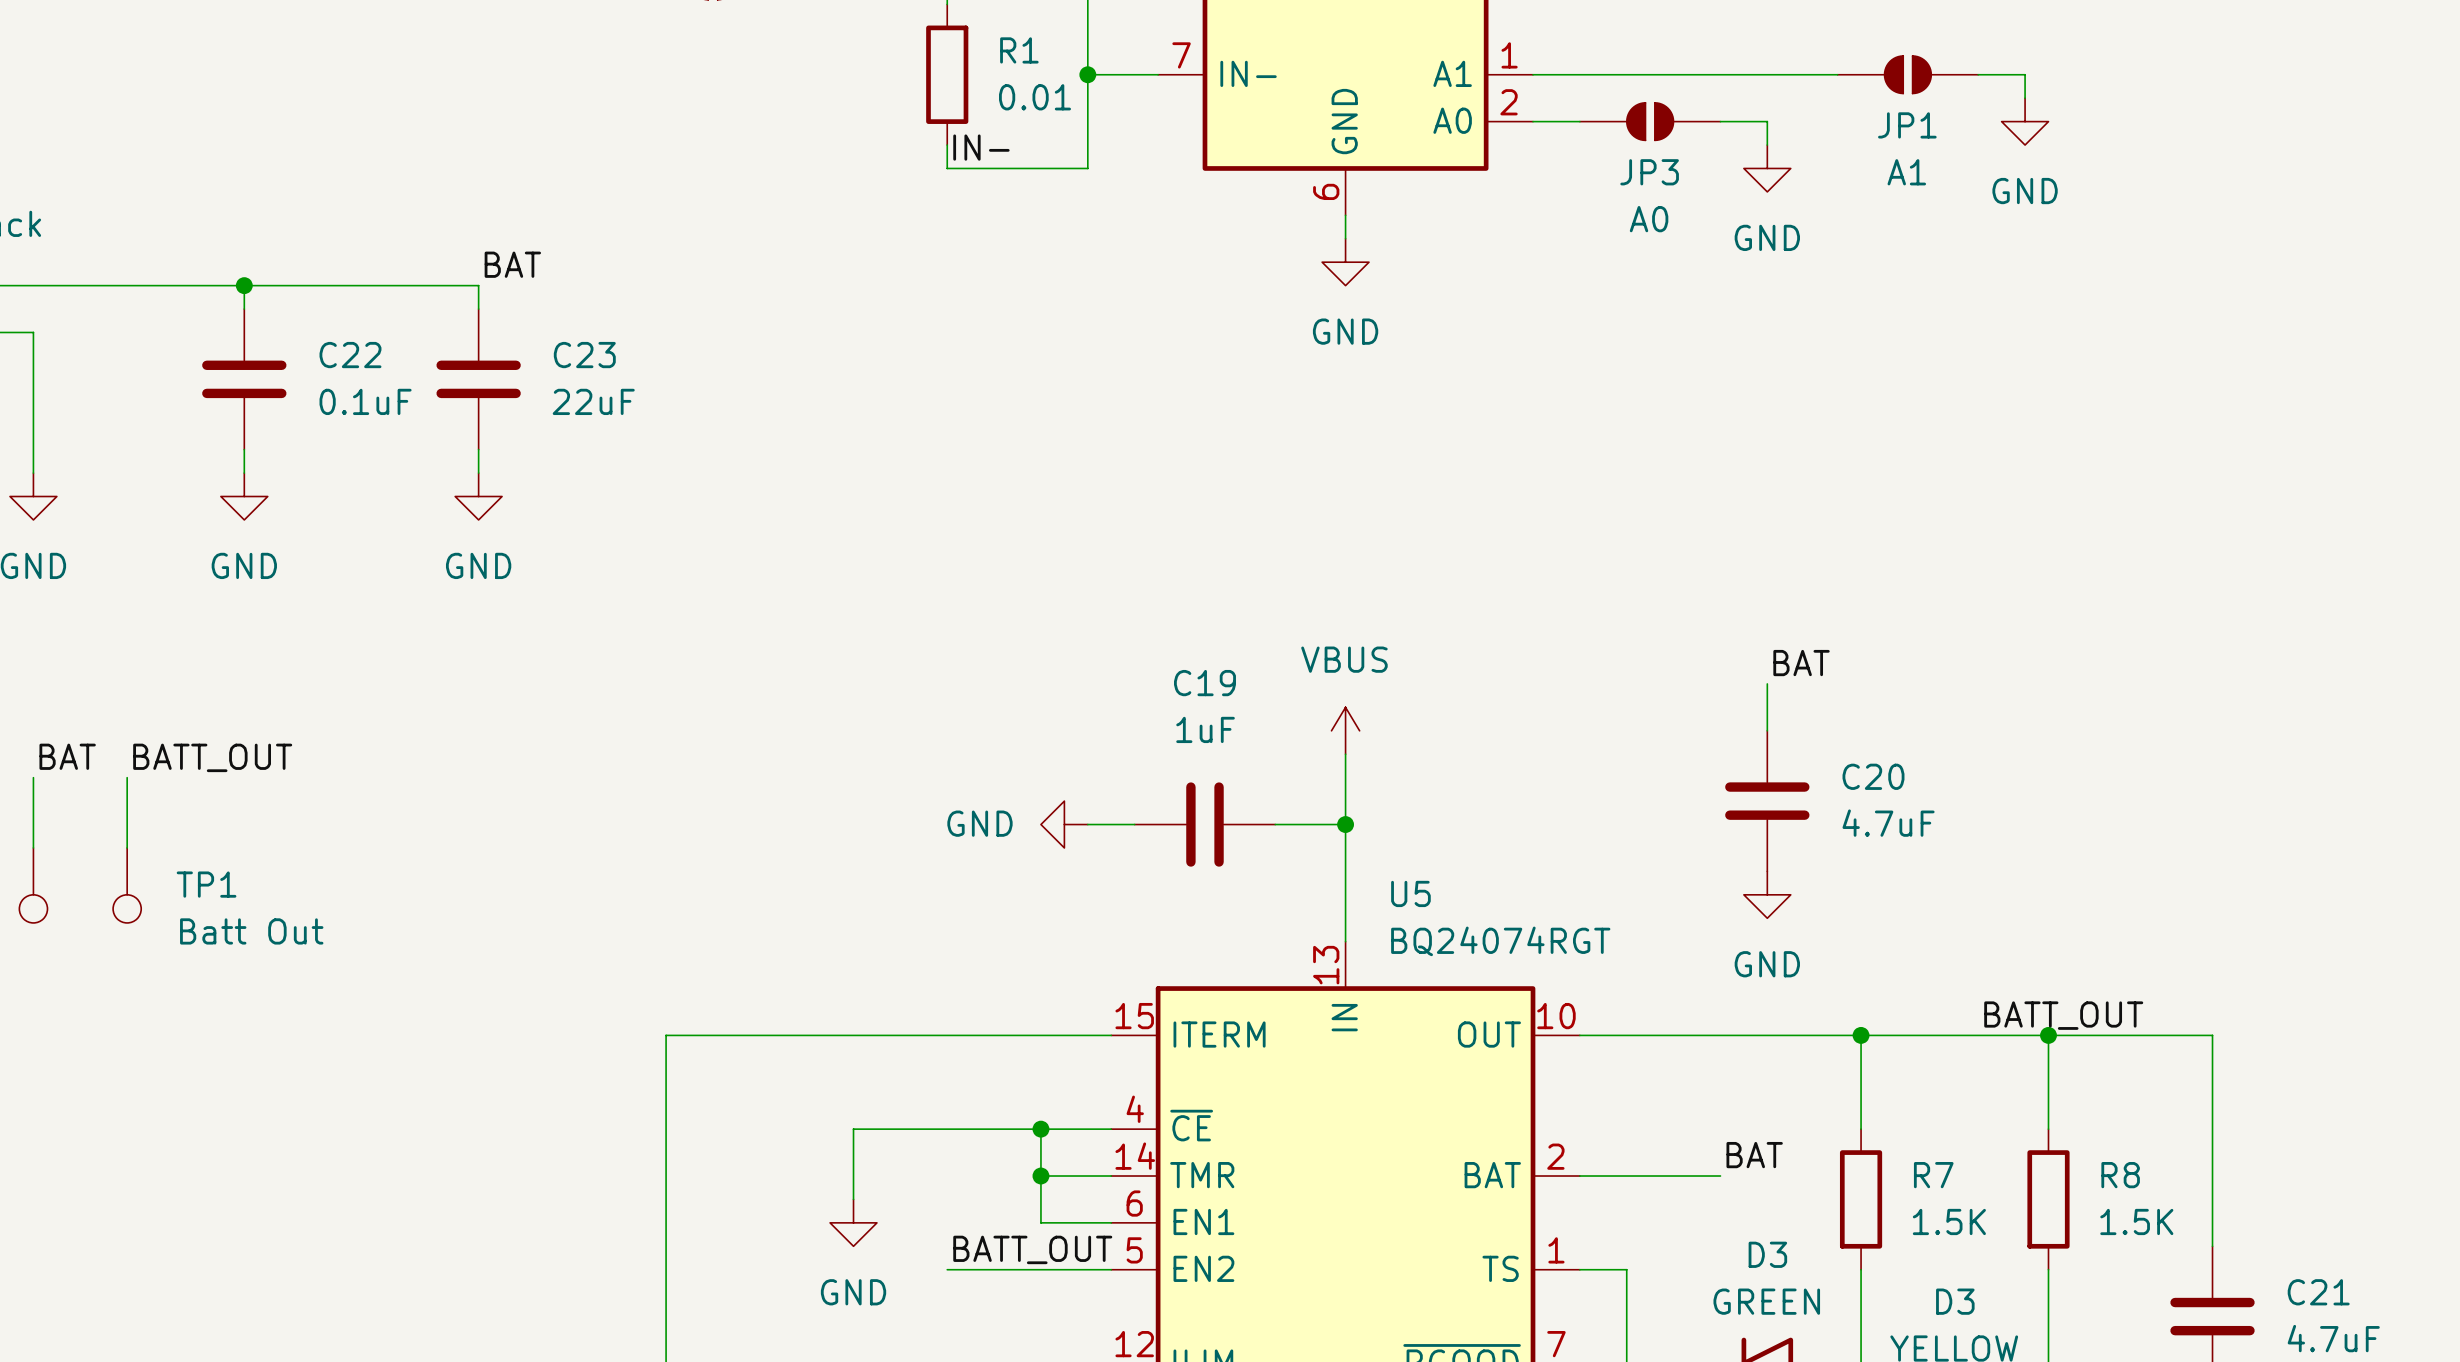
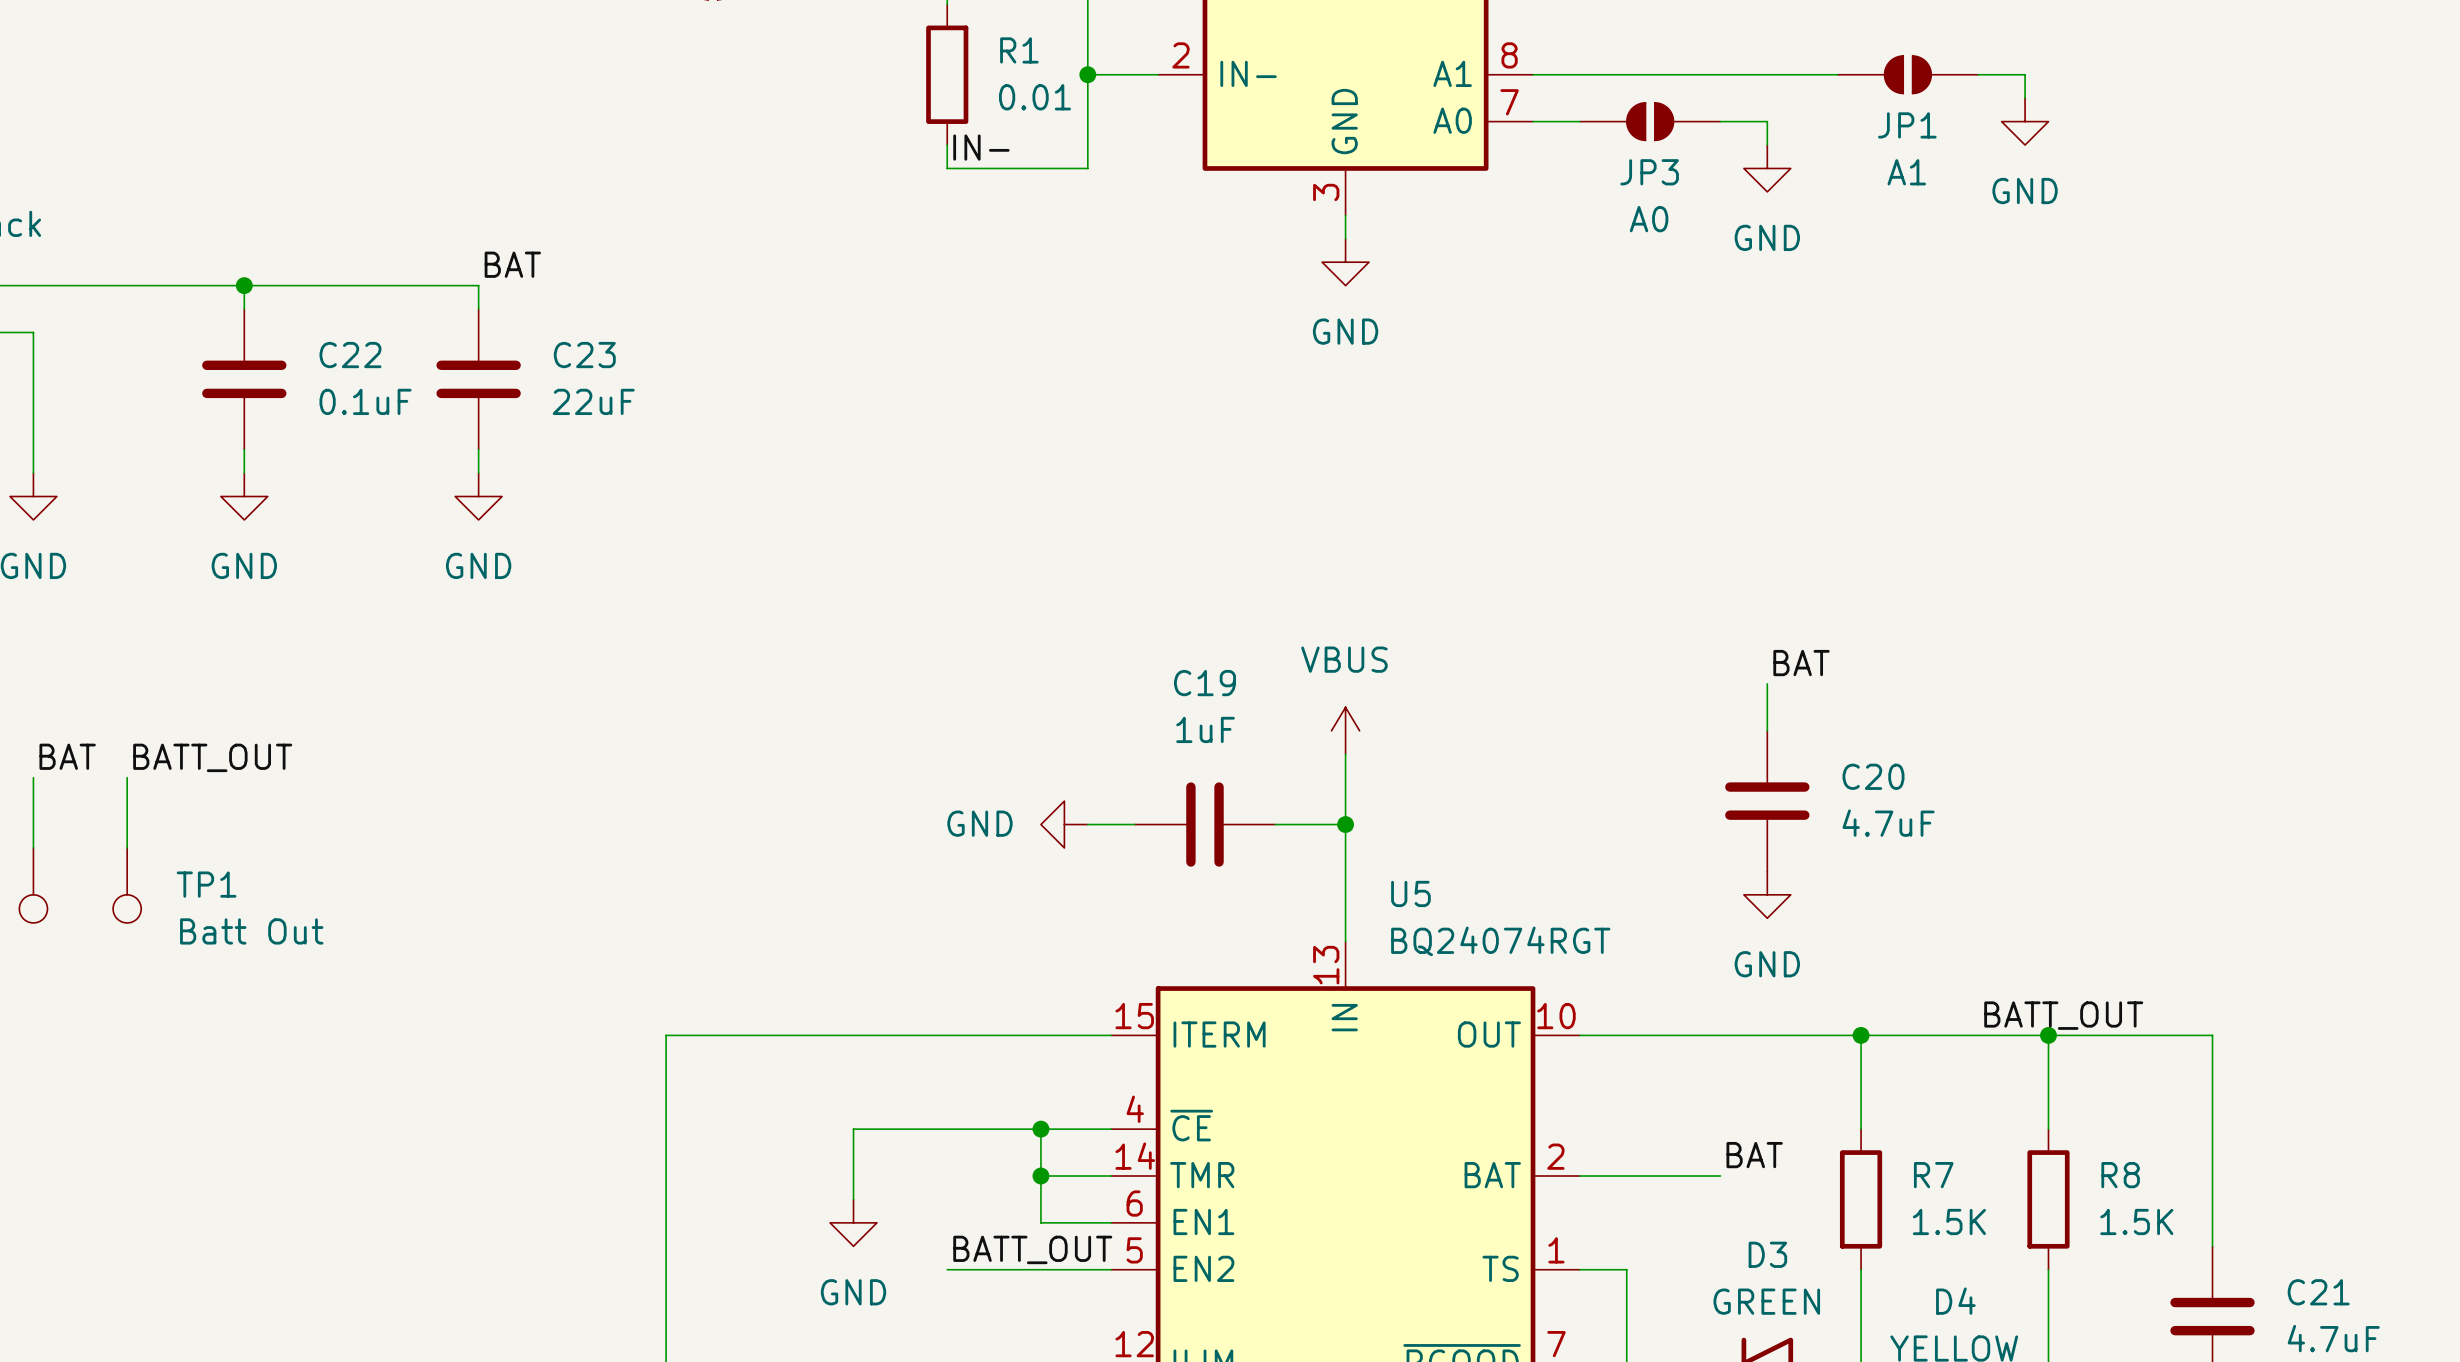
part pin number: 7 (1181, 55) -> 2 (1180, 55)
part pin number: 1 (1509, 55) -> 8 (1509, 55)
part pin number: 2 (1509, 102) -> 7 (1509, 102)
part pin number: 6 (1326, 191) -> 3 (1326, 192)
D3 name: D3 (1955, 1301) -> D4 (1955, 1301)

